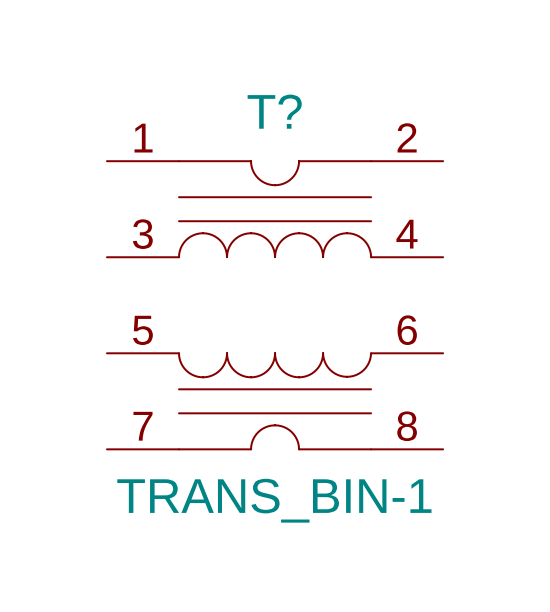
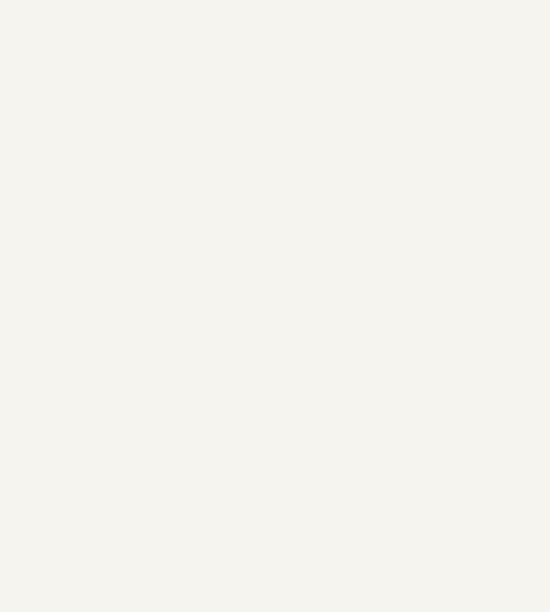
T?: TRANS_BIN-1 (275, 305) -> none

